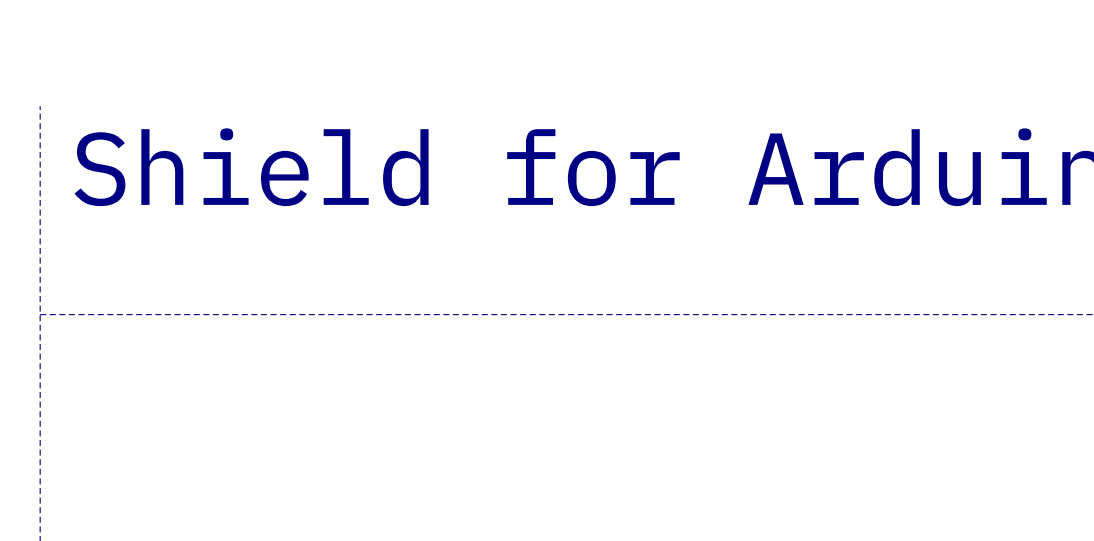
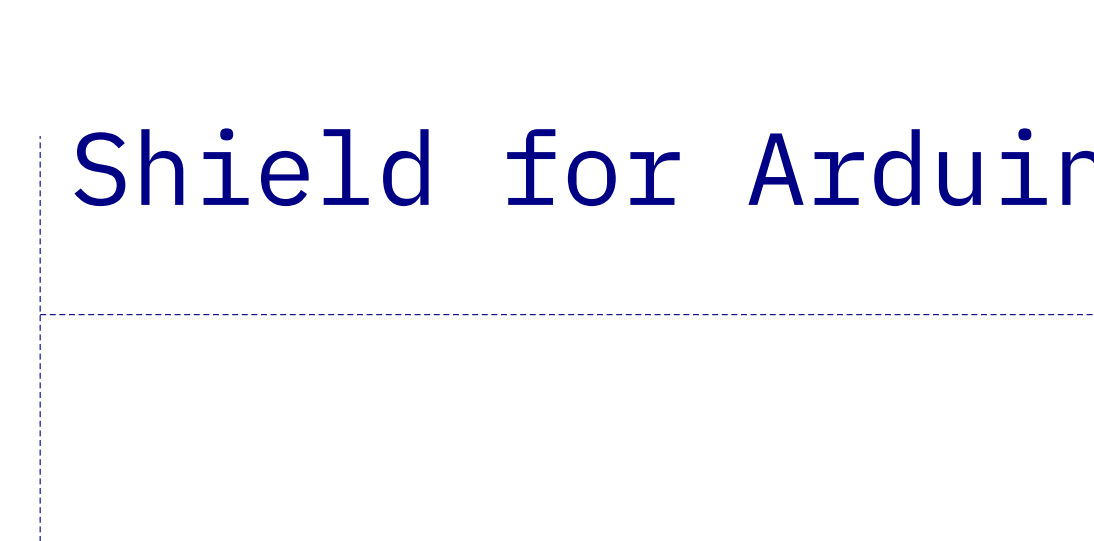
line: (40, 106) (40, 136) -> none

